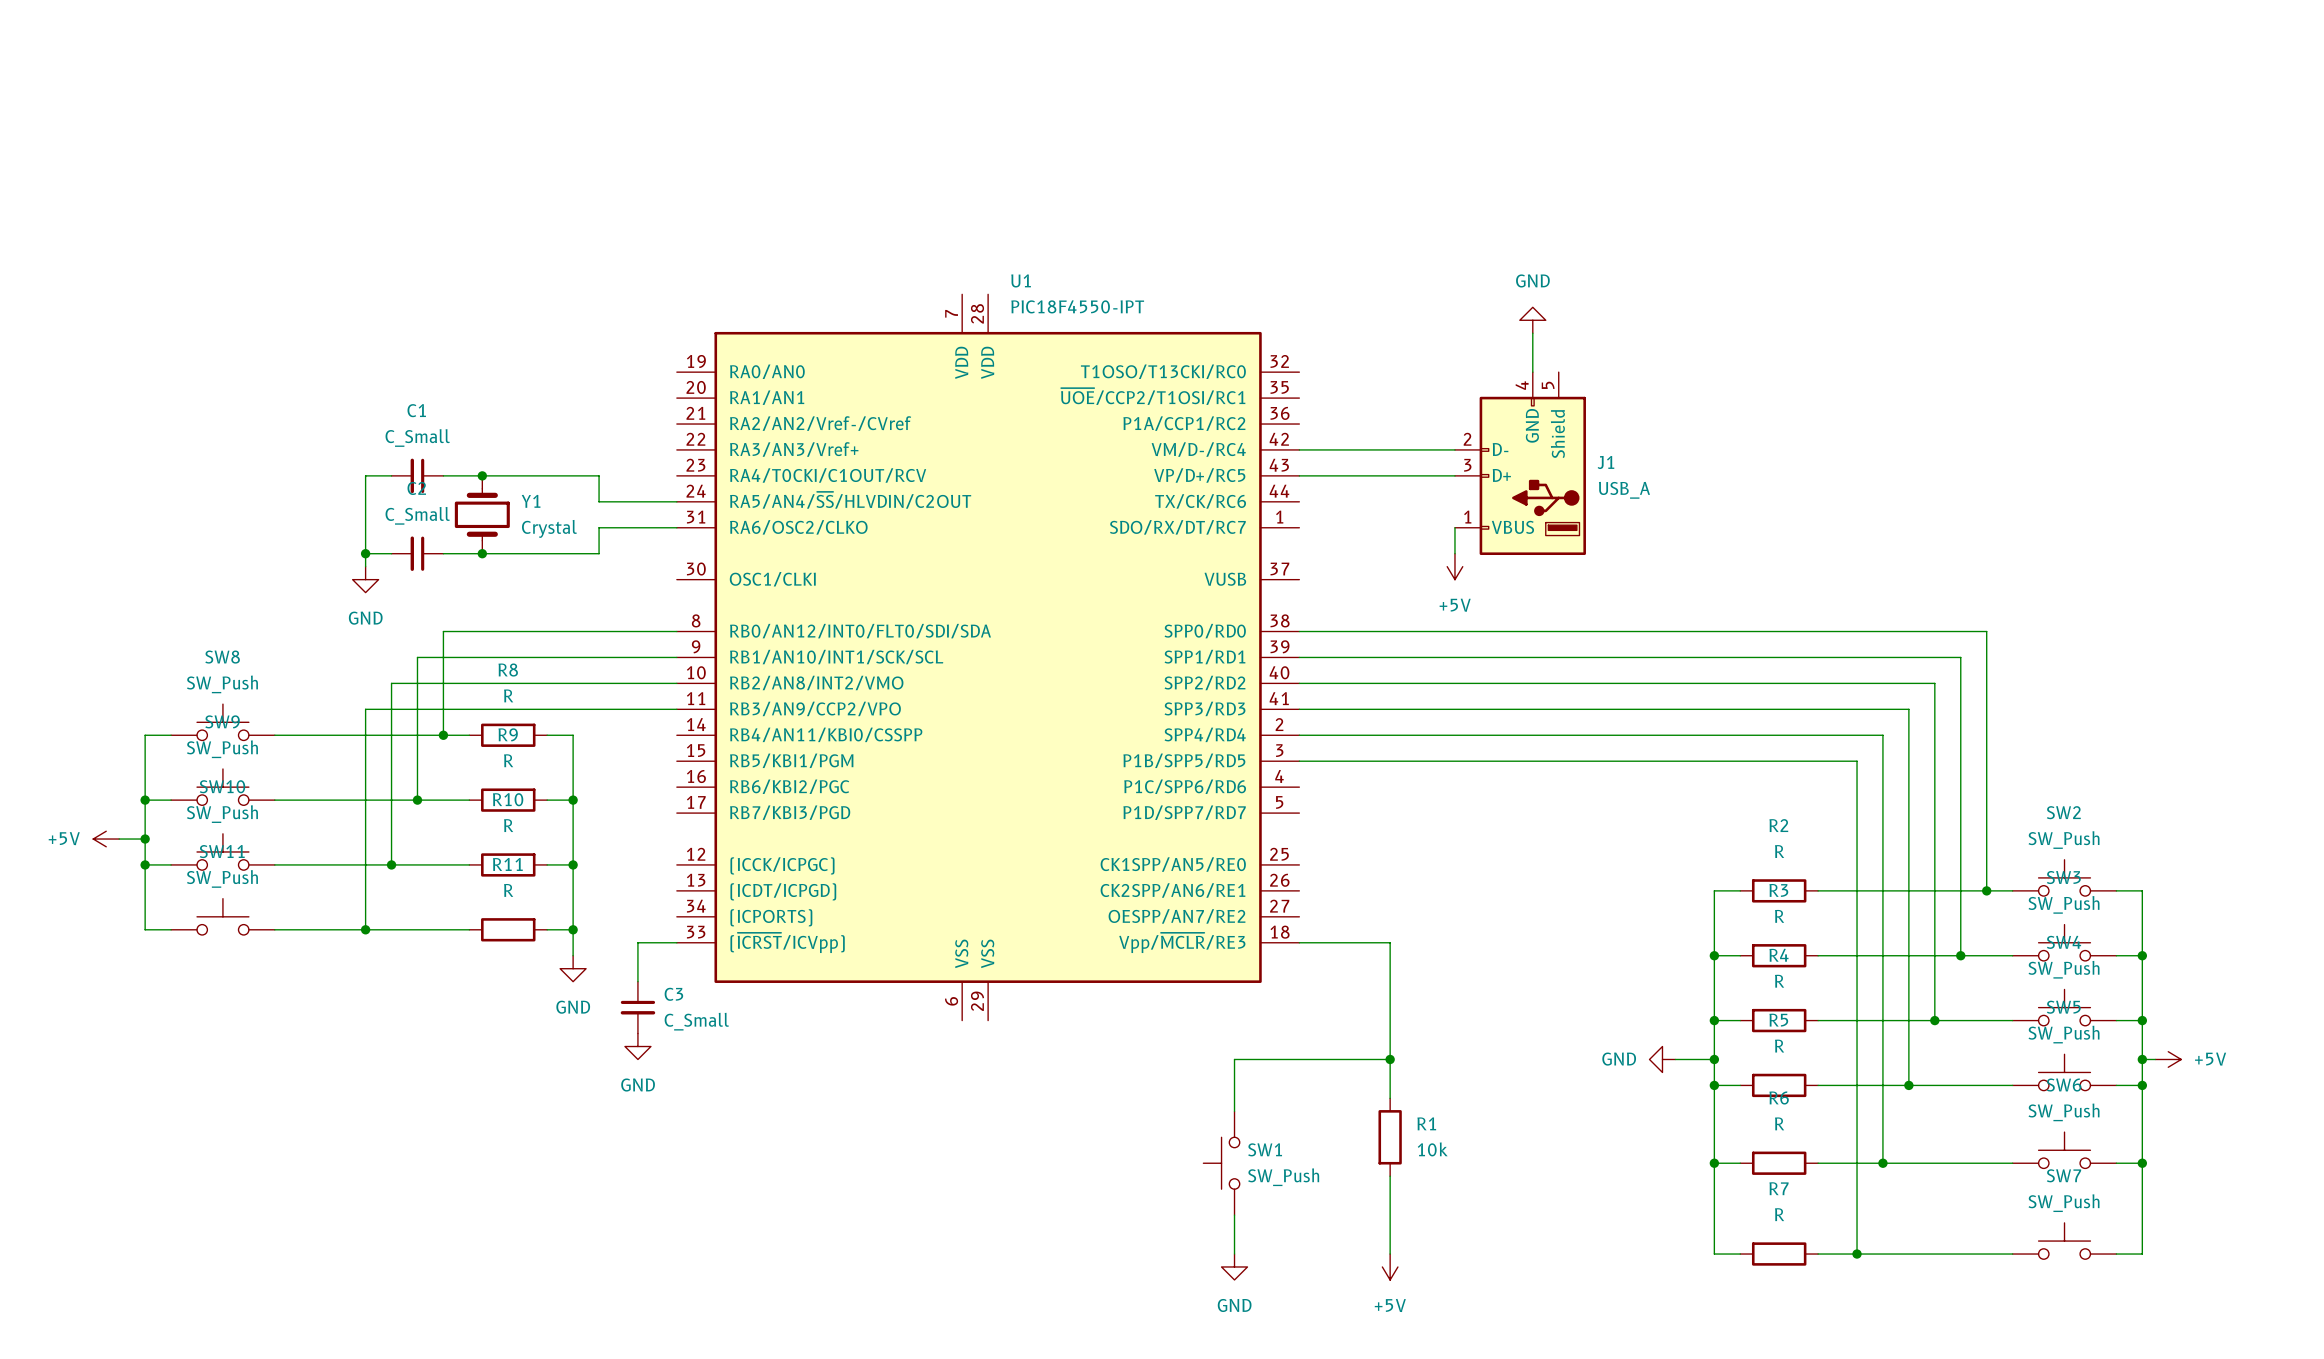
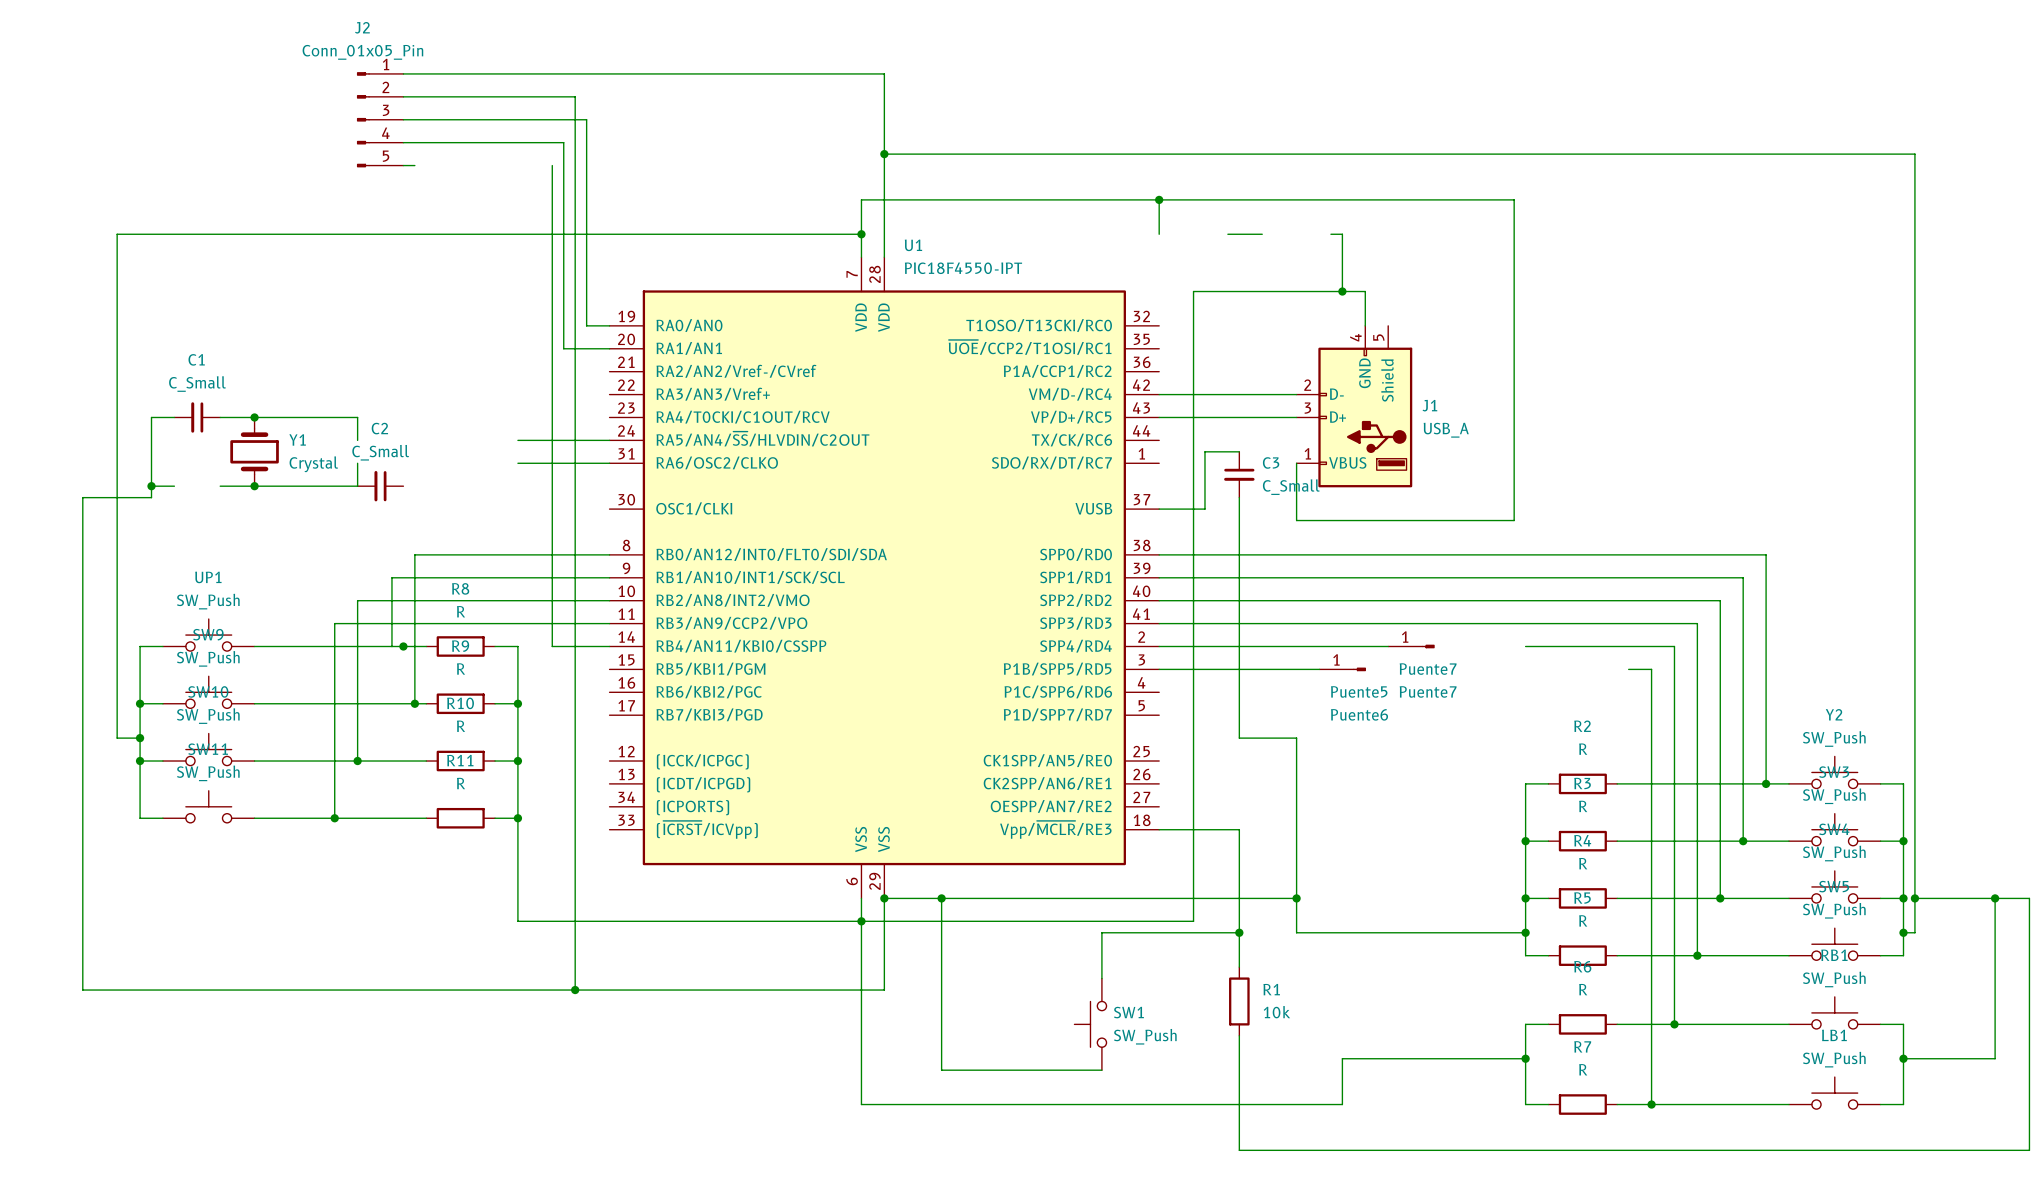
wire: none -> (403, 73) (884, 73) (884, 257)
J2: none -> Conn_01x05_Pin (380, 119)
wire: none -> (403, 119) (586, 119) (586, 325) (609, 325)
wire: none -> (403, 142) (563, 142) (563, 348) (609, 348)
wire: none -> (884, 154) (1914, 154) (1914, 932)
junction: none -> (884, 154)
wire: none -> (403, 165) (414, 165)
wire: none -> (552, 165) (552, 646) (609, 646)
wire: none -> (1159, 199) (1159, 234)
junction: none -> (1159, 199)
wire: none -> (861, 234) (117, 234) (117, 738)
junction: none -> (861, 234)
wire: none -> (1227, 234) (1262, 234)
wire: none -> (1330, 234) (1342, 234) (1342, 291)
wire: none -> (861, 257) (861, 199) (1514, 199) (1514, 520) (1296, 520) (1296, 486)
power symbol: GND (1532, 320) -> none
junction: none -> (1342, 291)
wire: none -> (1365, 291) (1193, 291) (1193, 921) (517, 921) (517, 841)
wire: none -> (174, 417) (151, 417) (151, 497) (82, 497) (82, 990) (884, 990) (884, 898) (1296, 898)
junction: none -> (254, 417)
wire: (365, 475) (365, 566) -> (334, 417) (220, 417)
wire: none -> (357, 417) (357, 440)
C1 position: (417, 475) -> (197, 417)
wire: (443, 475) (599, 475) (599, 501) -> (517, 440) (540, 440)
junction: (482, 475) -> none
Y1 position: (482, 514) -> (254, 451)
wire: none -> (1239, 451) (1204, 451) (1204, 509) (1159, 509)
wire: none -> (357, 463) (357, 486)
wire: (599, 527) (599, 553) (443, 553) -> (540, 463) (517, 463)
wire: none -> (151, 486) (174, 486)
junction: none -> (151, 486)
wire: none -> (220, 486) (334, 486)
junction: none -> (254, 486)
junction: (365, 553) -> none
junction: (482, 553) -> none
wire: none -> (1239, 497) (1239, 738) (1296, 738) (1296, 932) (1491, 932)
power symbol: +5V (1454, 566) -> none
power symbol: GND (365, 579) -> none
wire: (456, 631) (443, 631) (443, 735) -> (414, 554) (414, 703)
SW8 name: SW8 (222, 657) -> UP1 (208, 577)
wire: (430, 657) (417, 657) (417, 800) -> (391, 577) (391, 646)
wire: (1558, 735) (1714, 735) -> none
Puente7: none -> Puente7 (1411, 646)
wire: (1480, 761) (1831, 761) -> none
Puente6: none -> Puente5 (1342, 669)
junction position: (417, 800) -> (414, 703)
SW2 name: SW2 (2063, 812) -> Y2 (1834, 714)
power symbol: +5V (106, 839) -> none
wire: (637, 942) (676, 942) -> (575, 829) (575, 96) (403, 96)
power symbol: GND (573, 968) -> none
wire: none -> (575, 864) (575, 990)
C3 position: (637, 1007) -> (1239, 474)
wire: none -> (861, 898) (861, 1104) (1342, 1104) (1342, 1058) (1525, 1058)
junction: none -> (884, 898)
junction: none -> (941, 898)
junction: none -> (1296, 898)
wire: none -> (1914, 898) (2029, 898) (2029, 1150) (1239, 1150) (1239, 1104)
junction: none -> (1914, 898)
wire: none -> (1995, 898) (1995, 1058) (1903, 1058)
junction: none -> (1995, 898)
power symbol: GND (637, 1046) -> none
junction: none -> (861, 921)
power symbol: GND (1662, 1059) -> none
power symbol: +5V (2168, 1059) -> none
wire: (1714, 1085) (1714, 1163) -> none
junction: (1714, 1085) -> none
SW6 name: SW6 (2064, 1085) -> RB1 (1834, 955)
wire: (2142, 1085) (2142, 1163) -> none
junction: (2142, 1085) -> none
junction: none -> (575, 990)
junction position: (1714, 1163) -> (1525, 1058)
junction position: (2142, 1163) -> (1903, 1058)
SW7 name: SW7 (2064, 1175) -> LB1 (1834, 1035)
wire: (1234, 1215) (1234, 1254) -> (1101, 1070) (941, 1070) (941, 898)
power symbol: GND (1234, 1266) -> none
power symbol: +5V (1390, 1266) -> none

